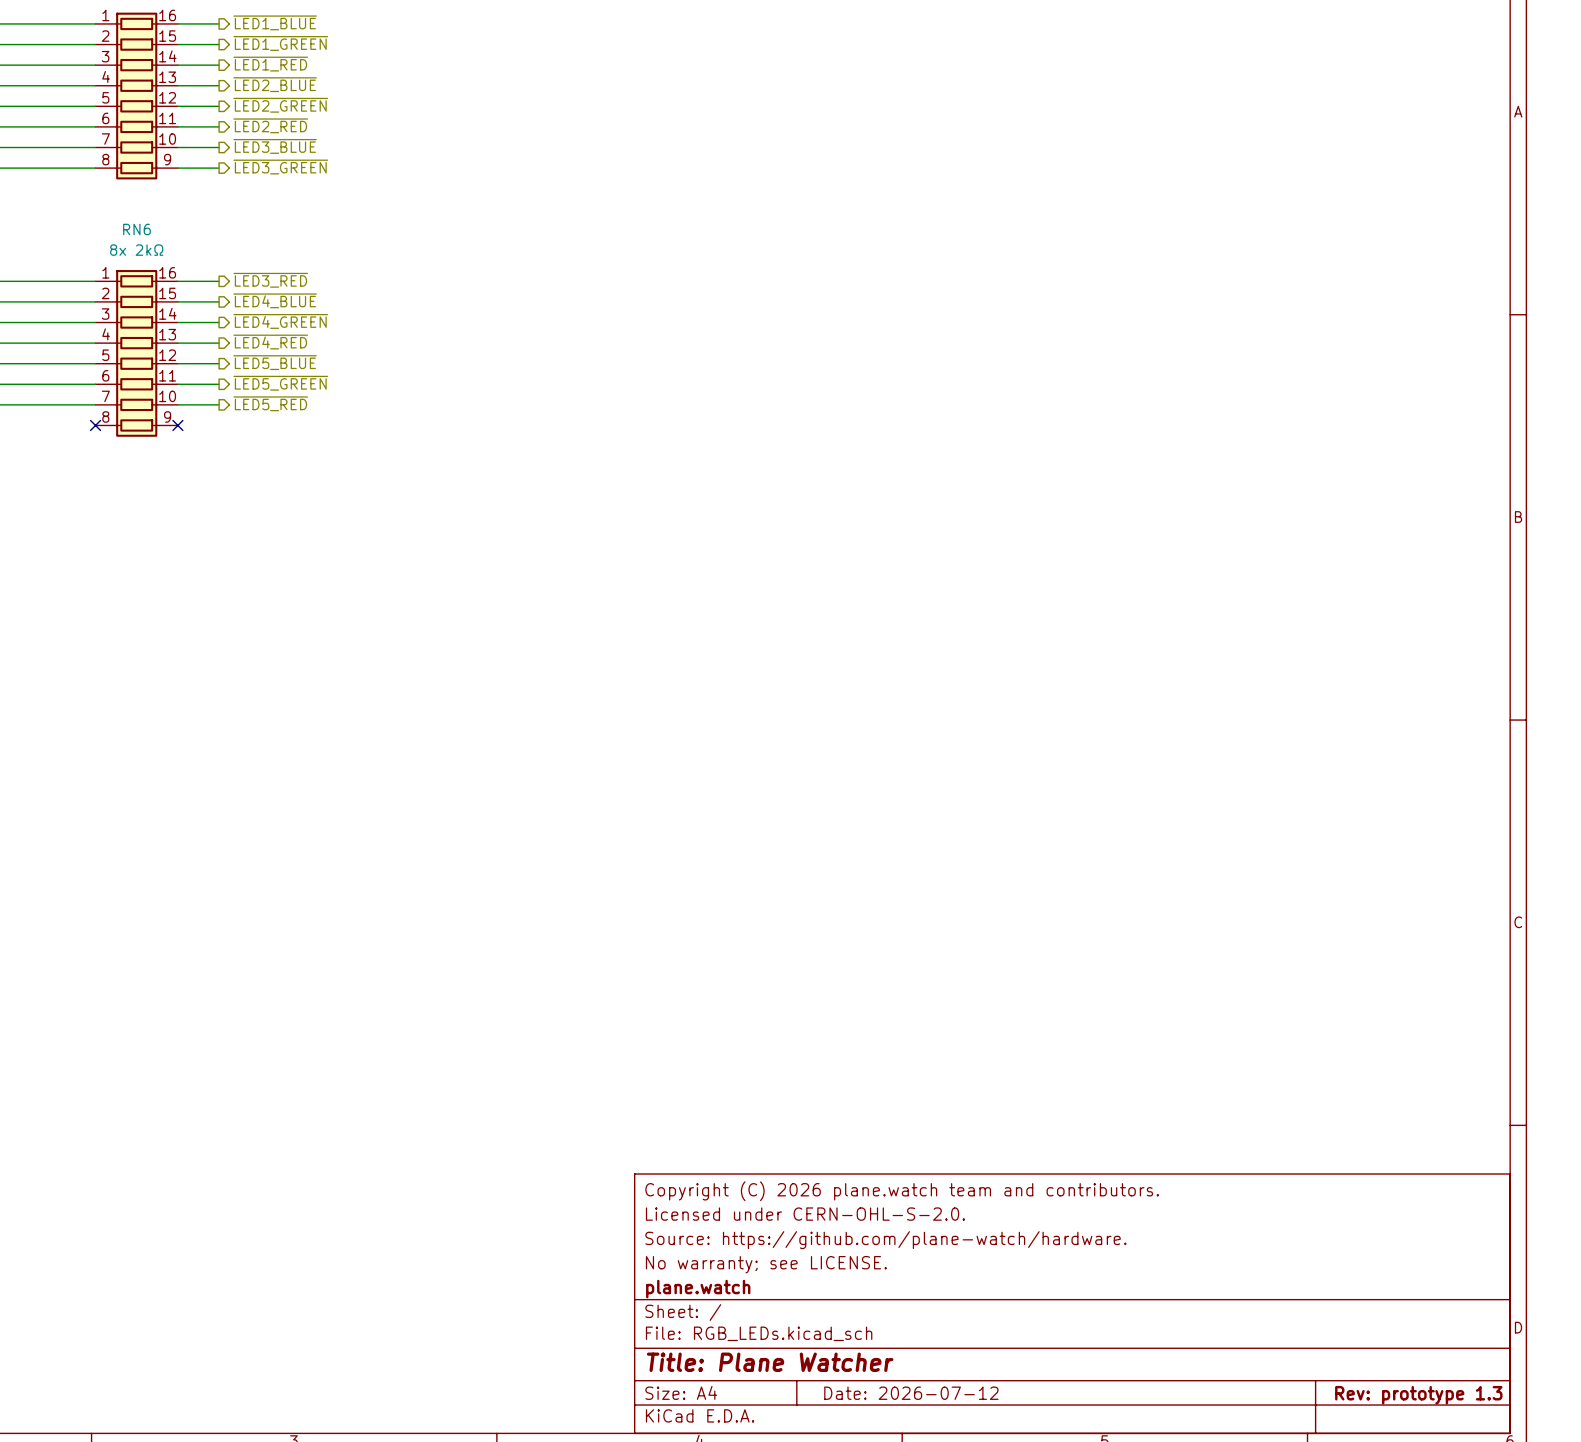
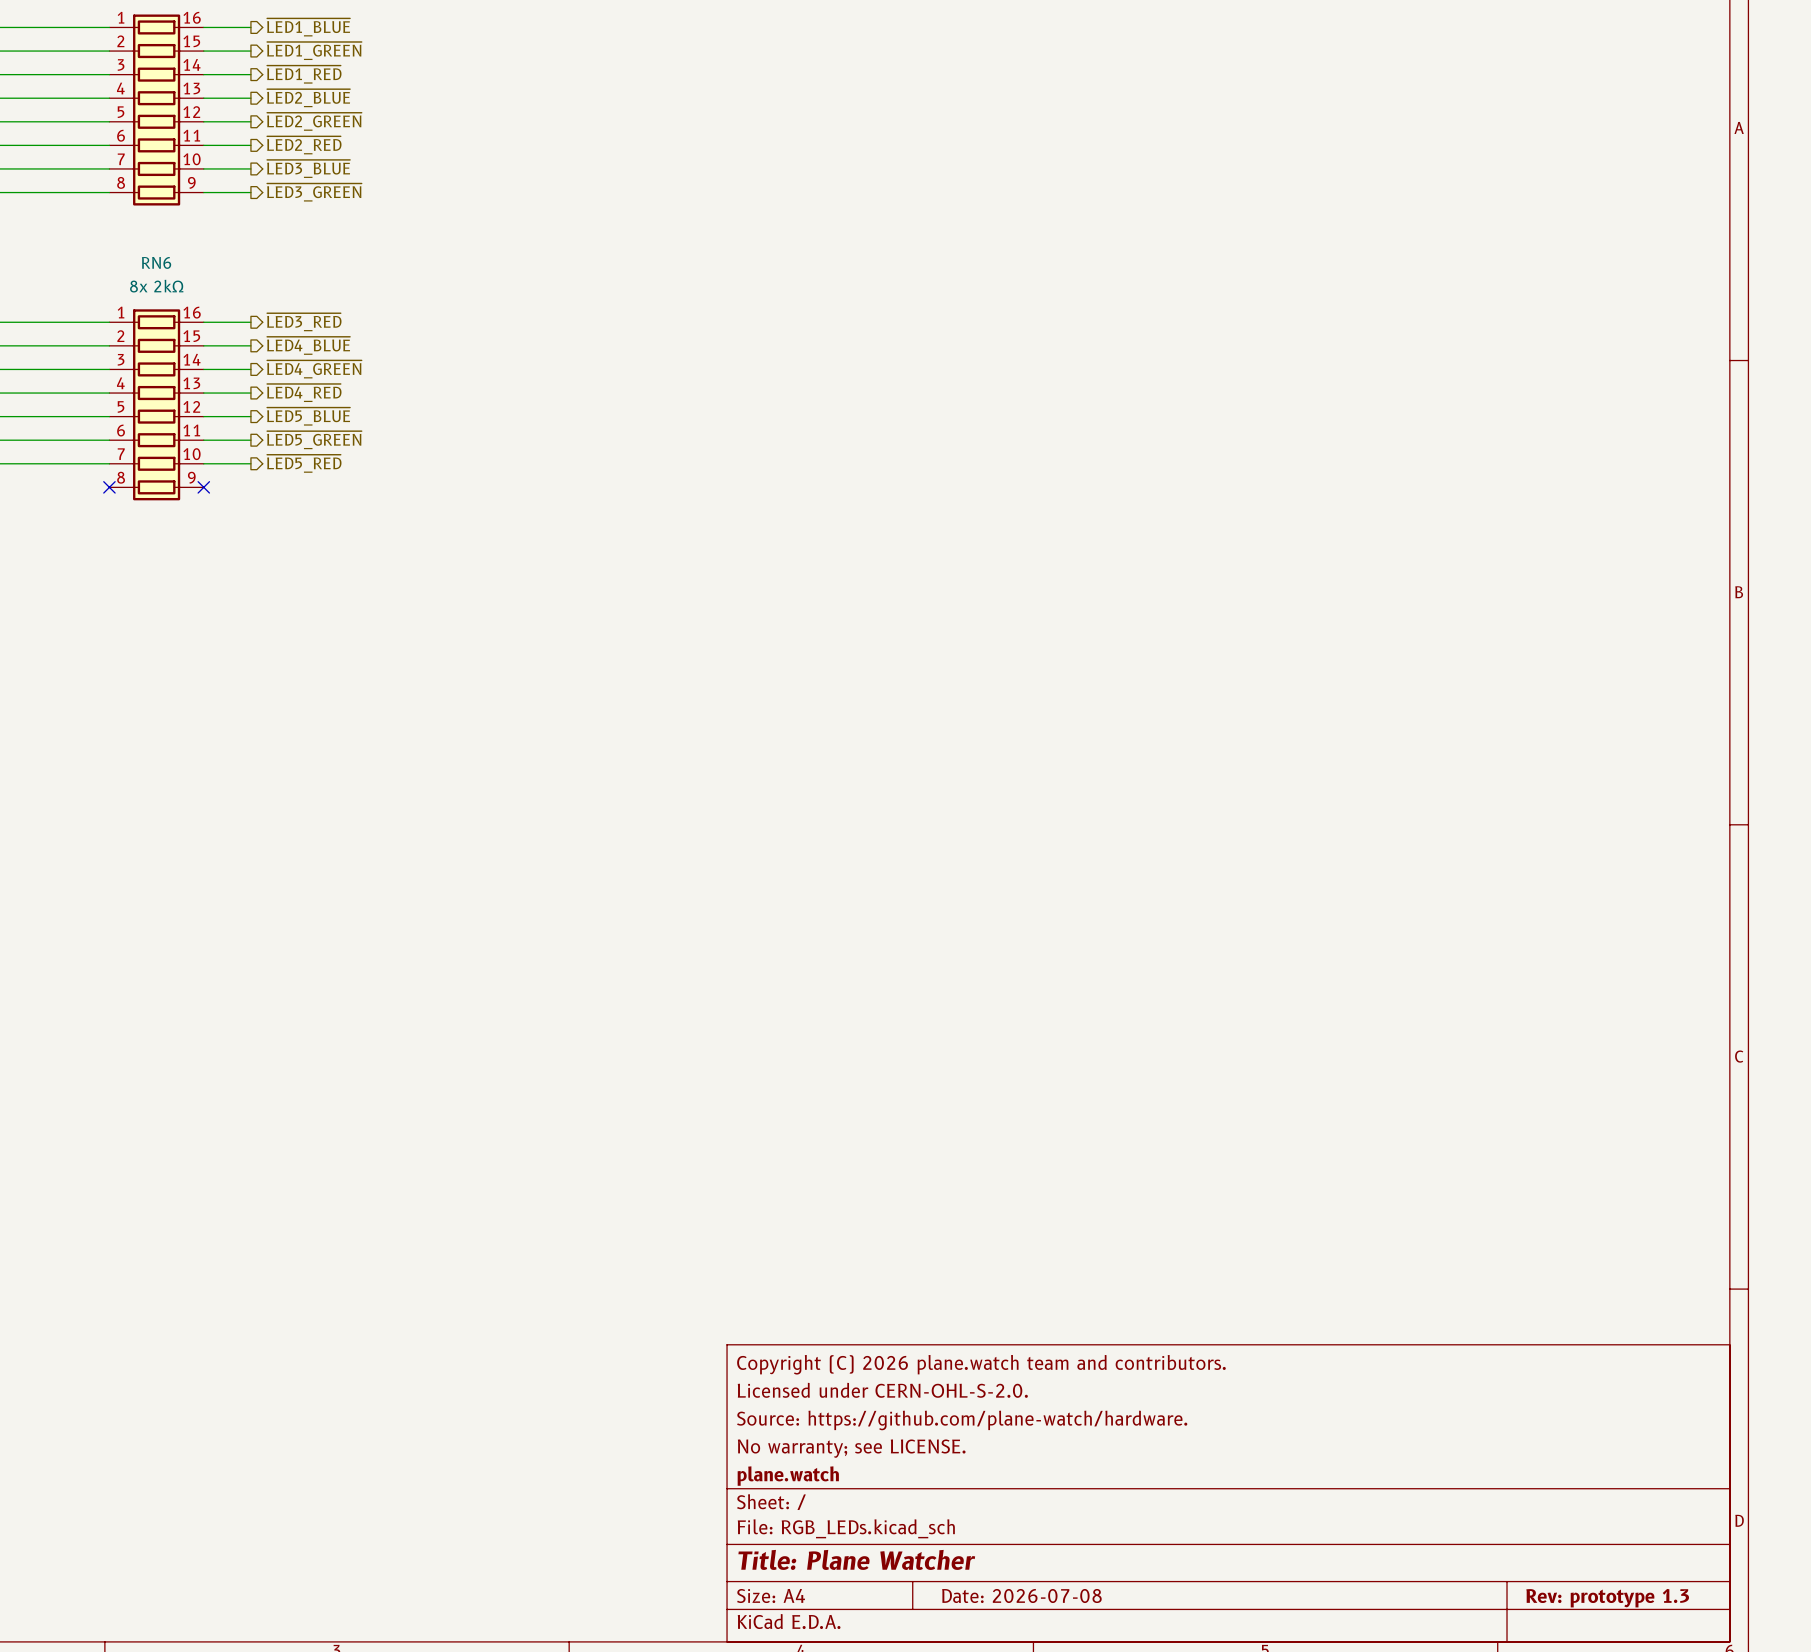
title block: Date: 2026-07-12 (911, 1393) -> Date: 2026-07-08 (1021, 1596)

